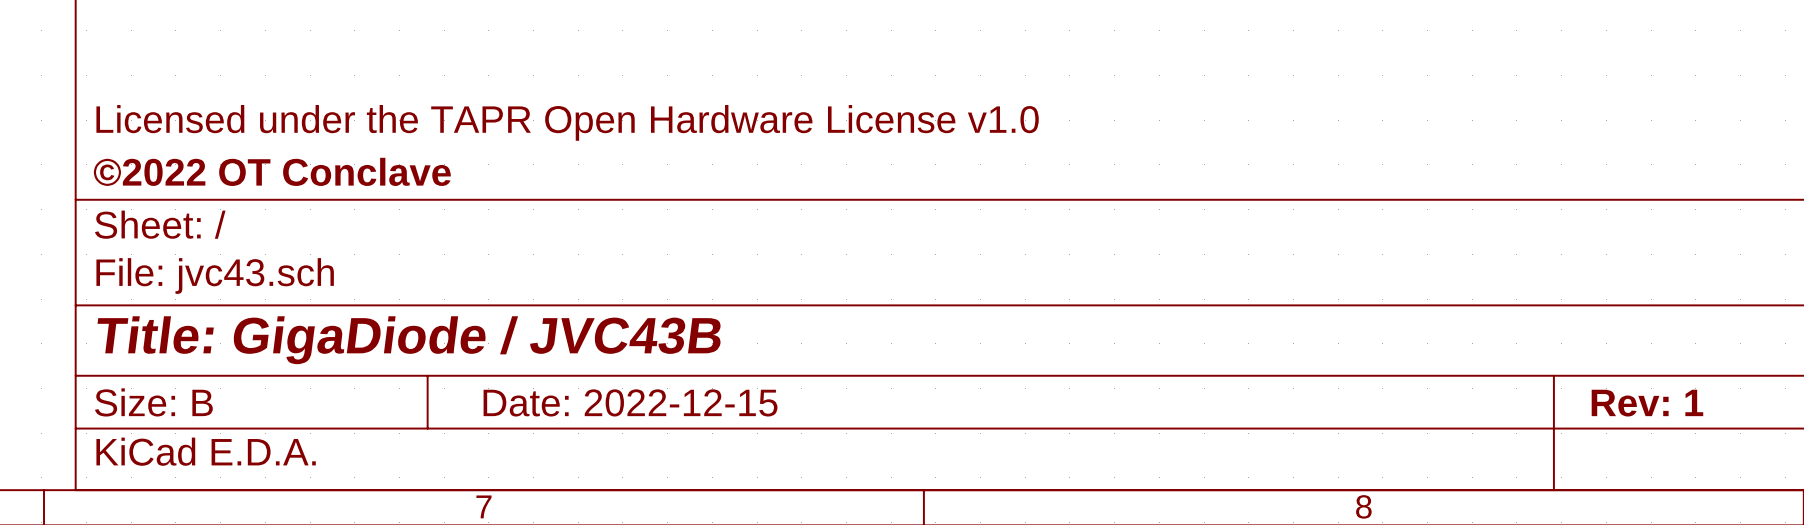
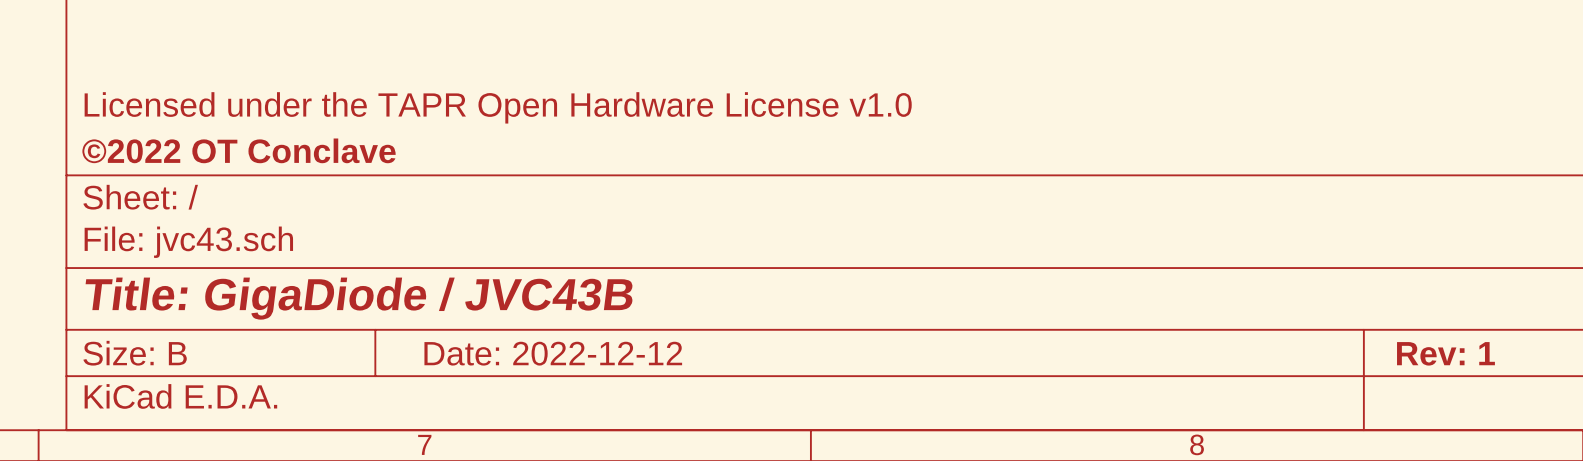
title block: Date: 2022-12-15 (630, 402) -> Date: 2022-12-12 (553, 353)

